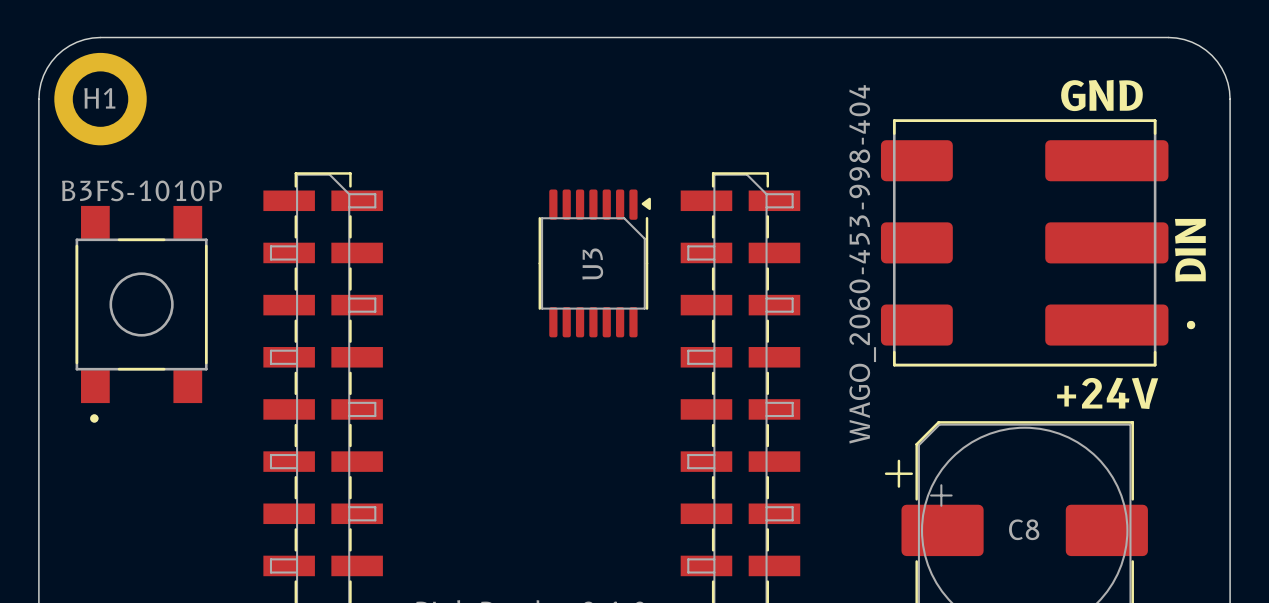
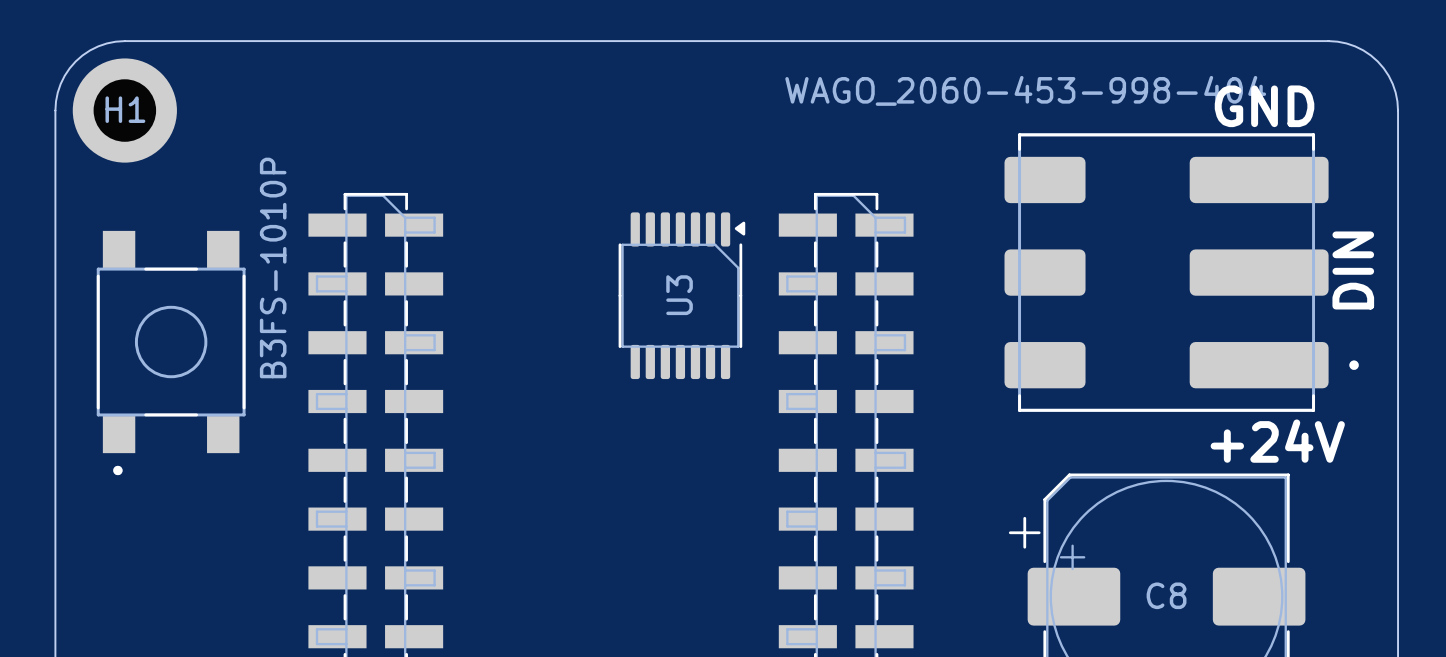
part value rotation: 0° (141, 190) -> 90° counterclockwise (273, 267)
part value rotation: 0° (862, 264) -> 90° clockwise (1025, 90)

